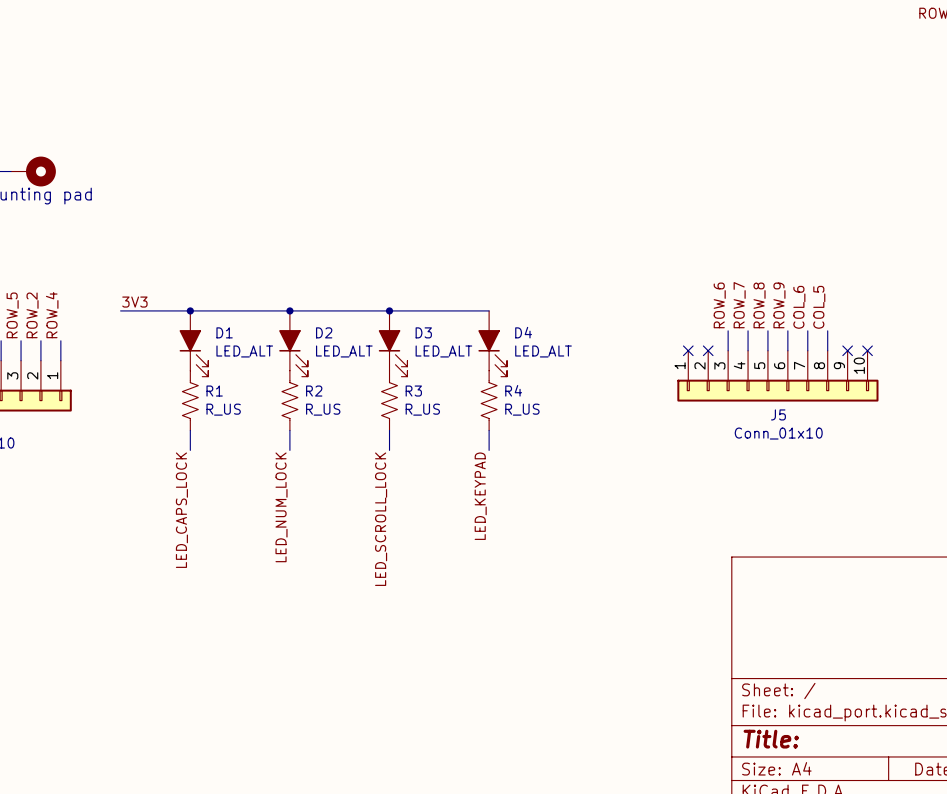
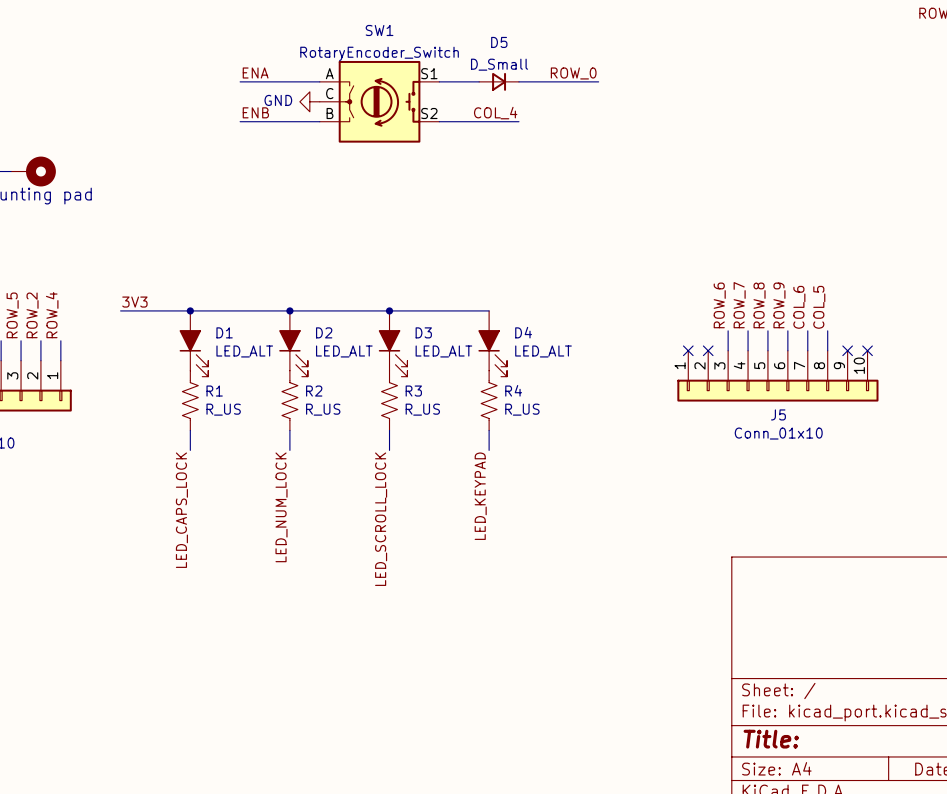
label: none -> ENA (255, 73)
label: none -> ROW_0 (573, 73)
wire: none -> (240, 81) (319, 81)
wire: none -> (439, 81) (479, 81)
D5: none -> D_Small (499, 81)
wire: none -> (518, 81) (598, 81)
power symbol: none -> GND (309, 101)
SW1: none -> RotaryEncoder_Switch (379, 101)
label: none -> ENB (255, 112)
label: none -> COL_4 (495, 113)
wire: none -> (240, 121) (319, 121)
wire: none -> (439, 121) (518, 121)

